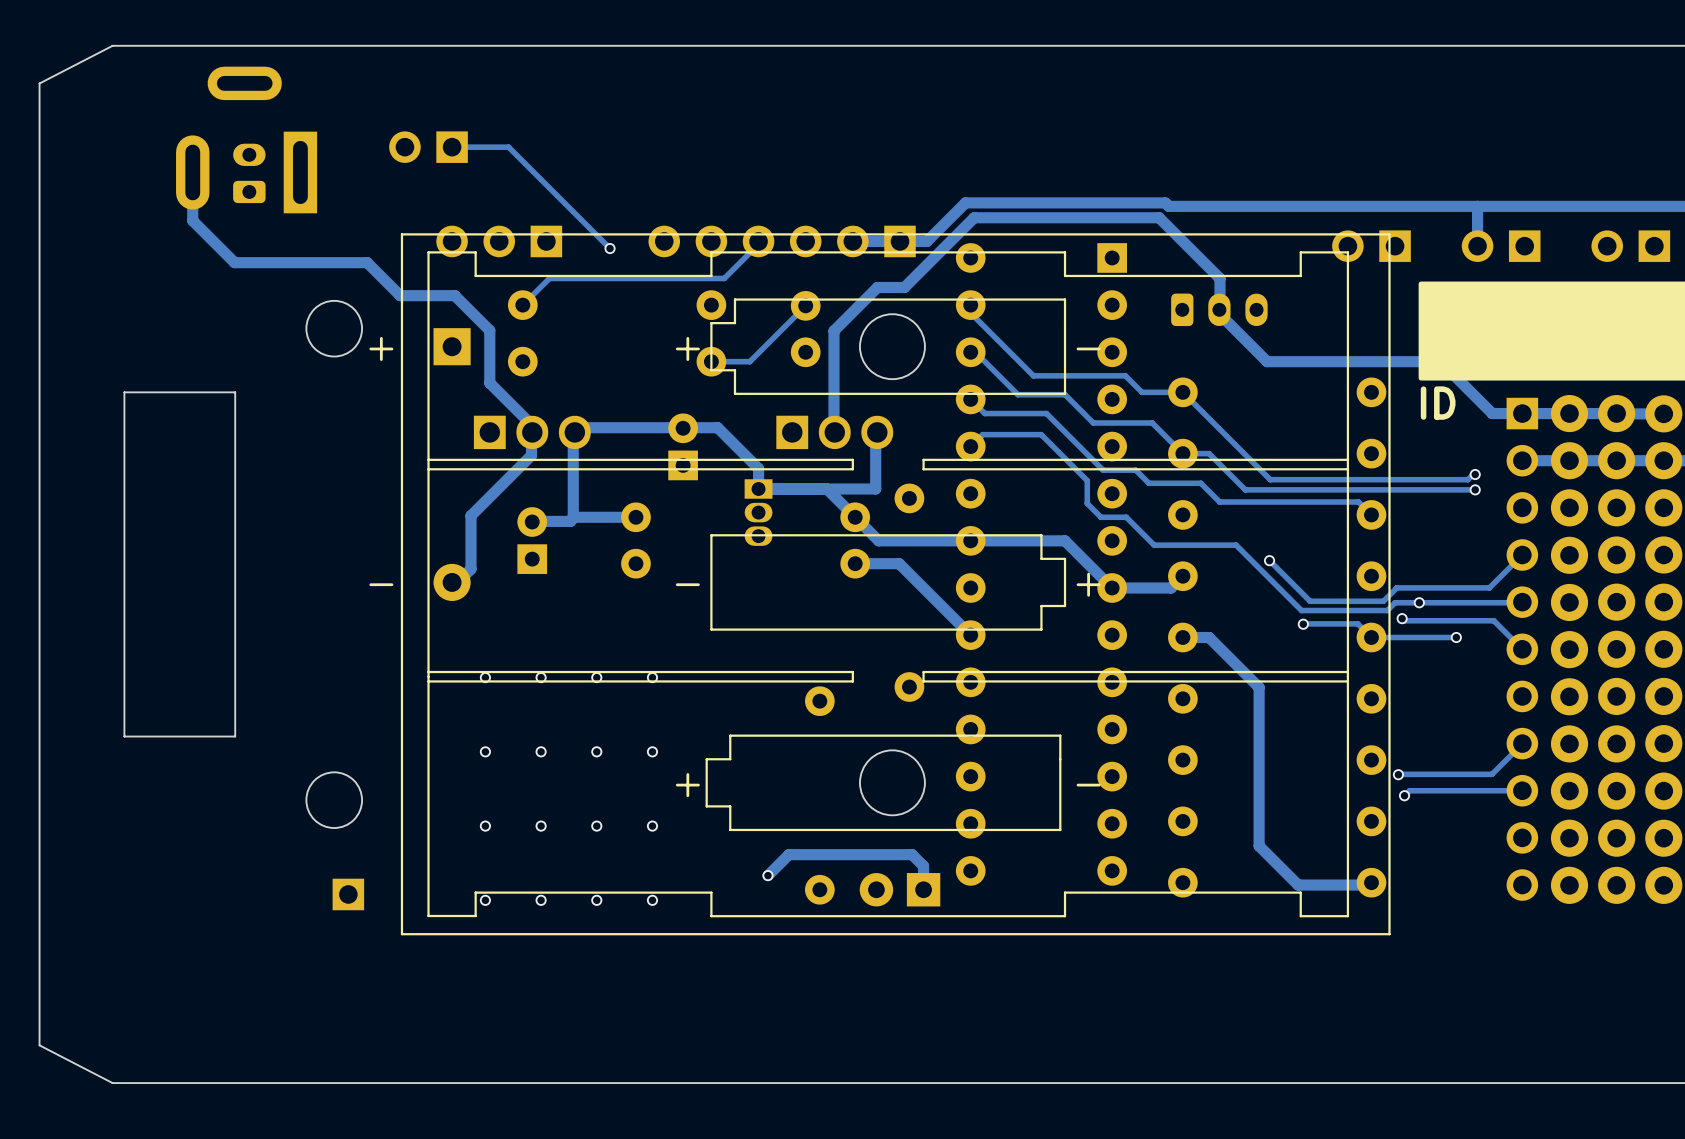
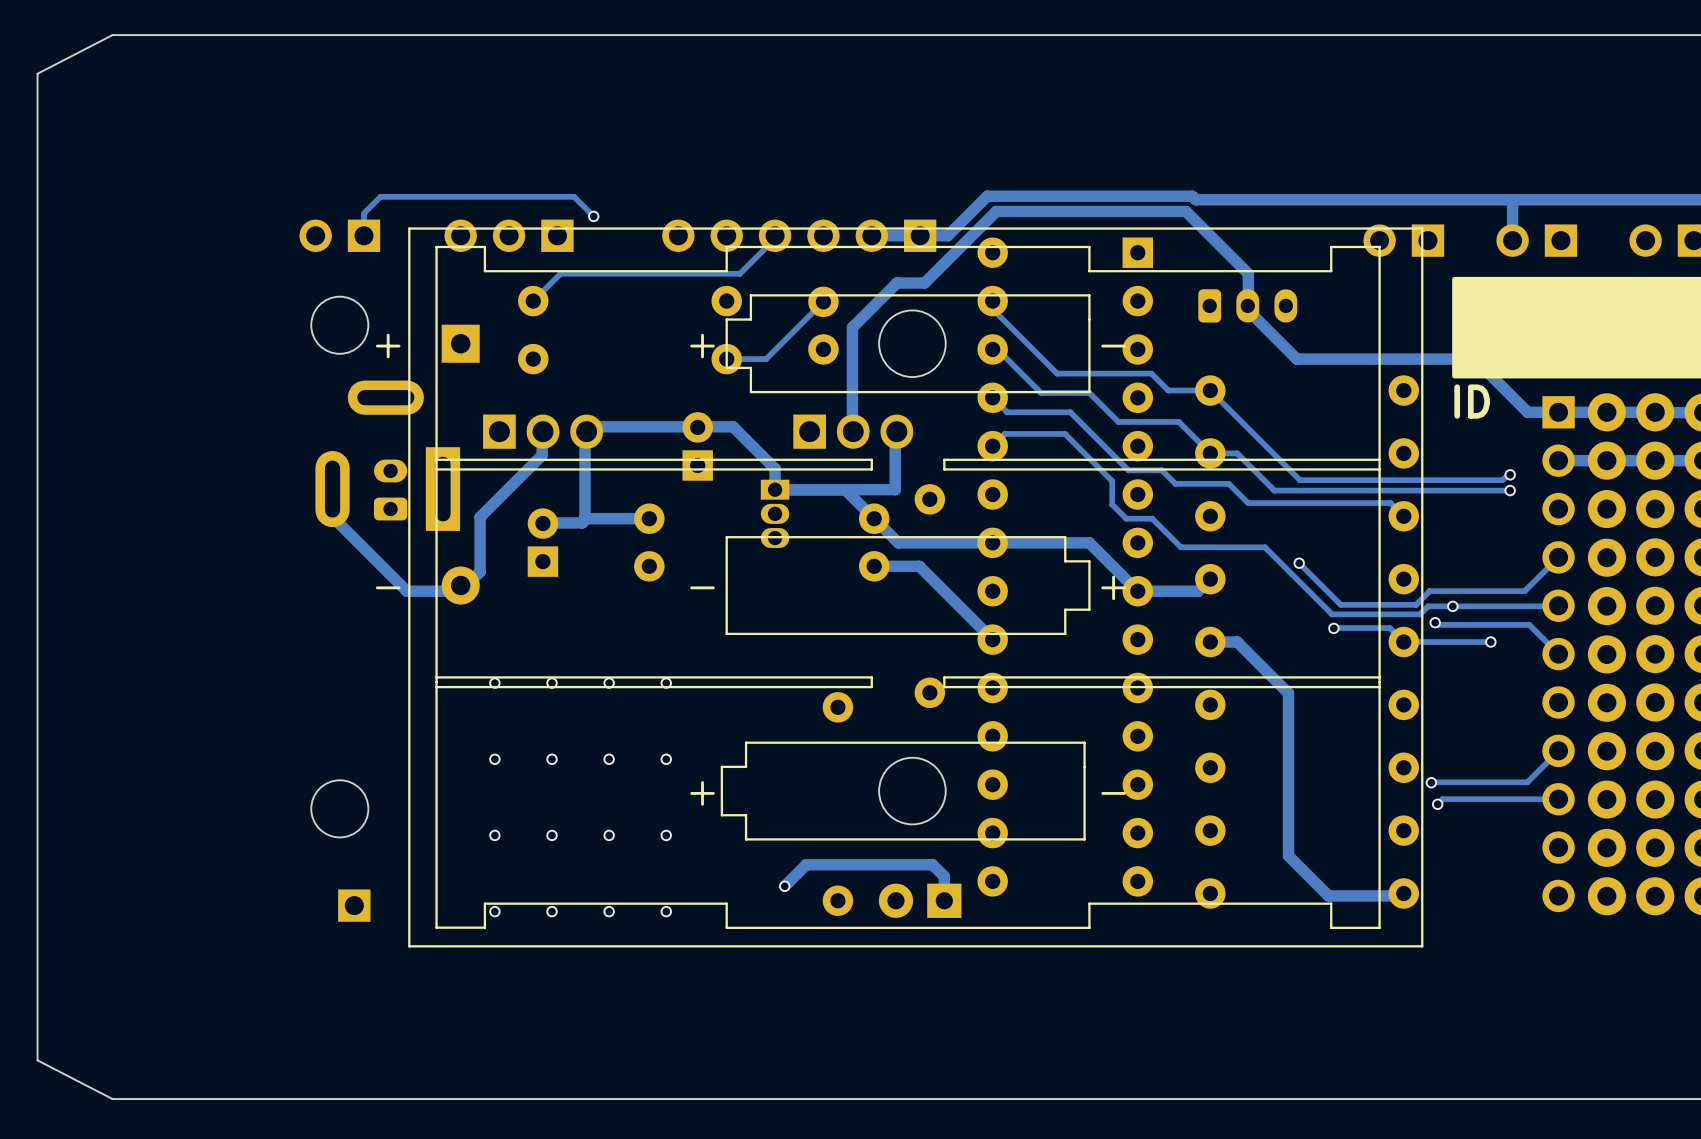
part position: (246, 140) -> (387, 455)
part position: (428, 147) -> (339, 235)
track: (452, 147) (508, 147) (610, 248) -> none
track: (192, 172) (192, 220) (234, 262) (367, 262) (400, 295) (454, 295) (489, 330) (489, 383) (532, 425) (532, 432) -> none
part position: (249, 173) -> (390, 489)
track: none -> (593, 216) (574, 196) (380, 196) (363, 213) (363, 235)
via position: (610, 248) -> (593, 216)
board edge: (235, 392) (235, 736) (124, 736) (124, 392) (235, 392) -> none
track: none -> (328, 489) (328, 512) (406, 591) (460, 591)

